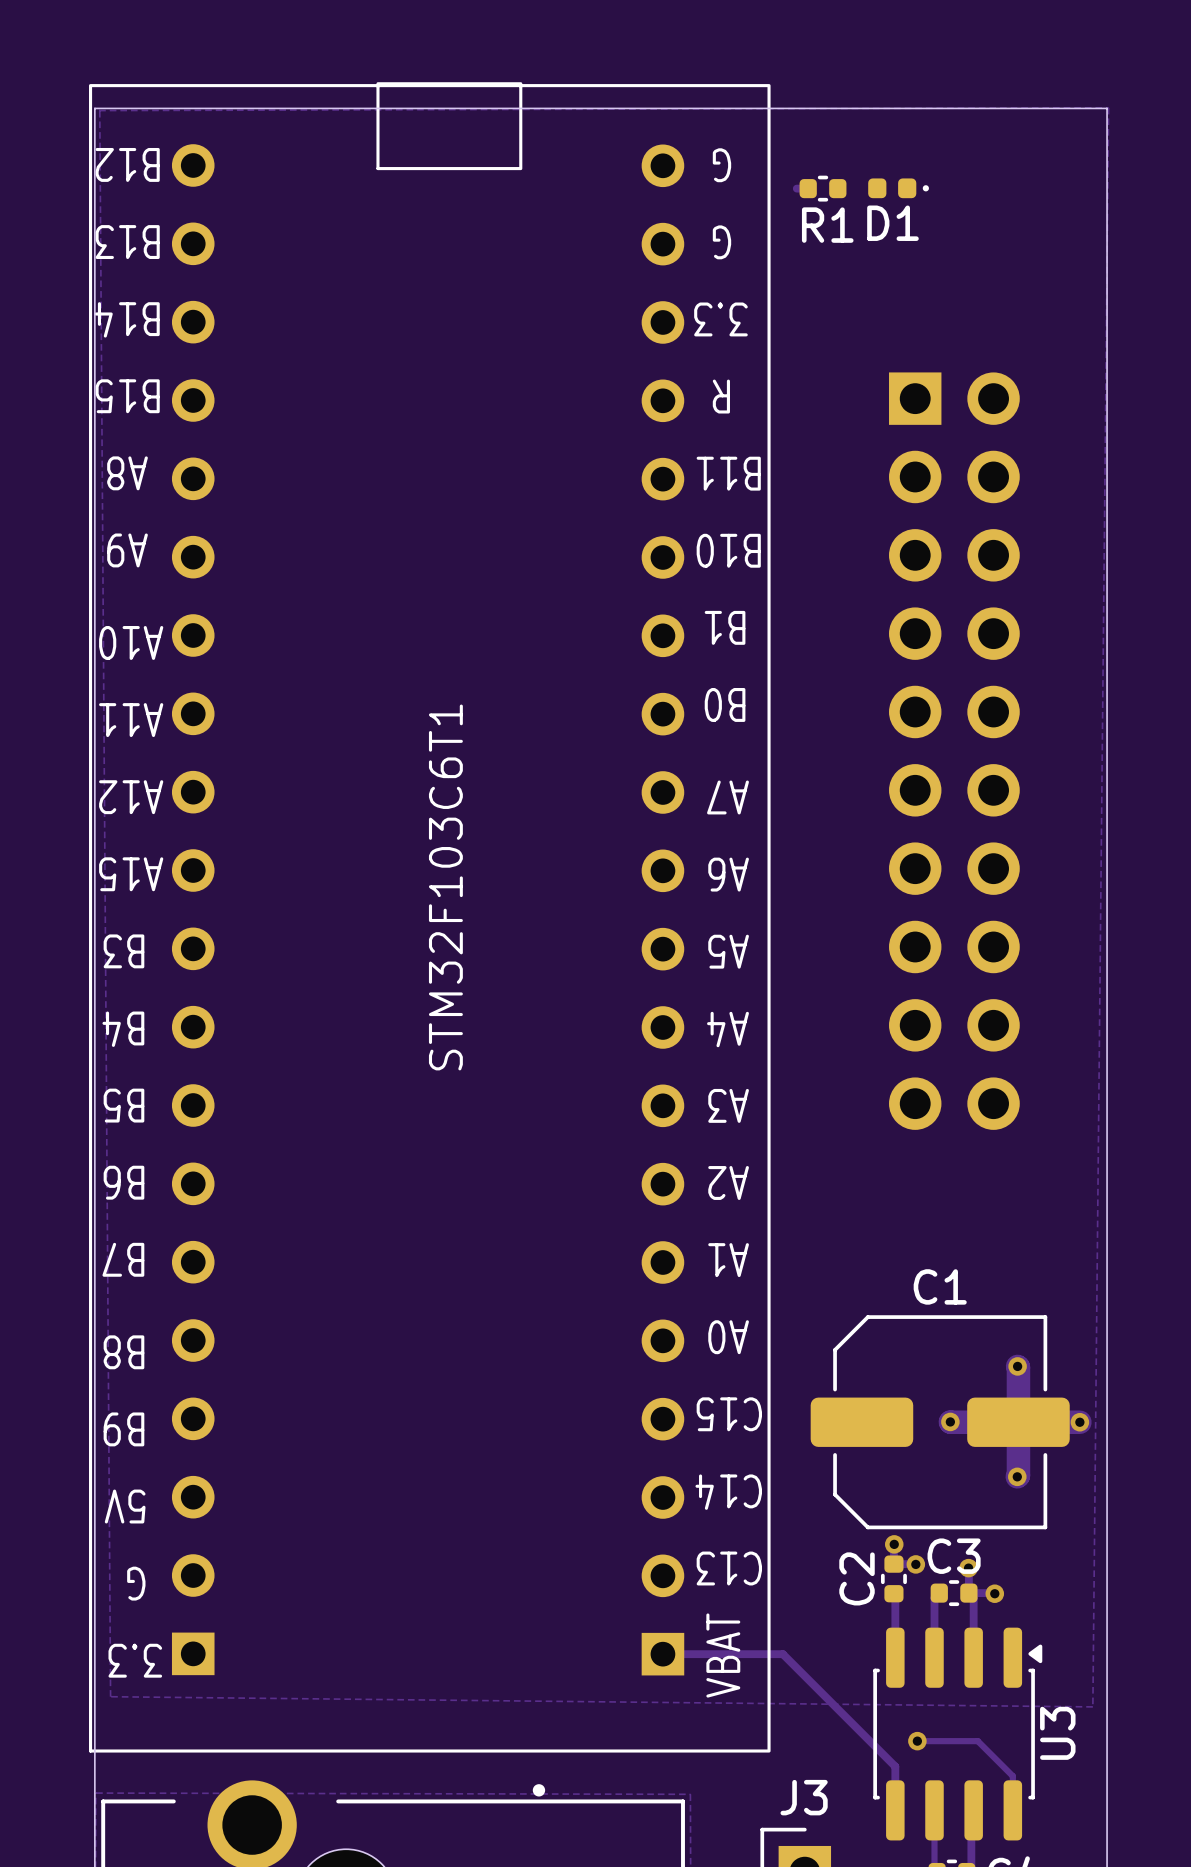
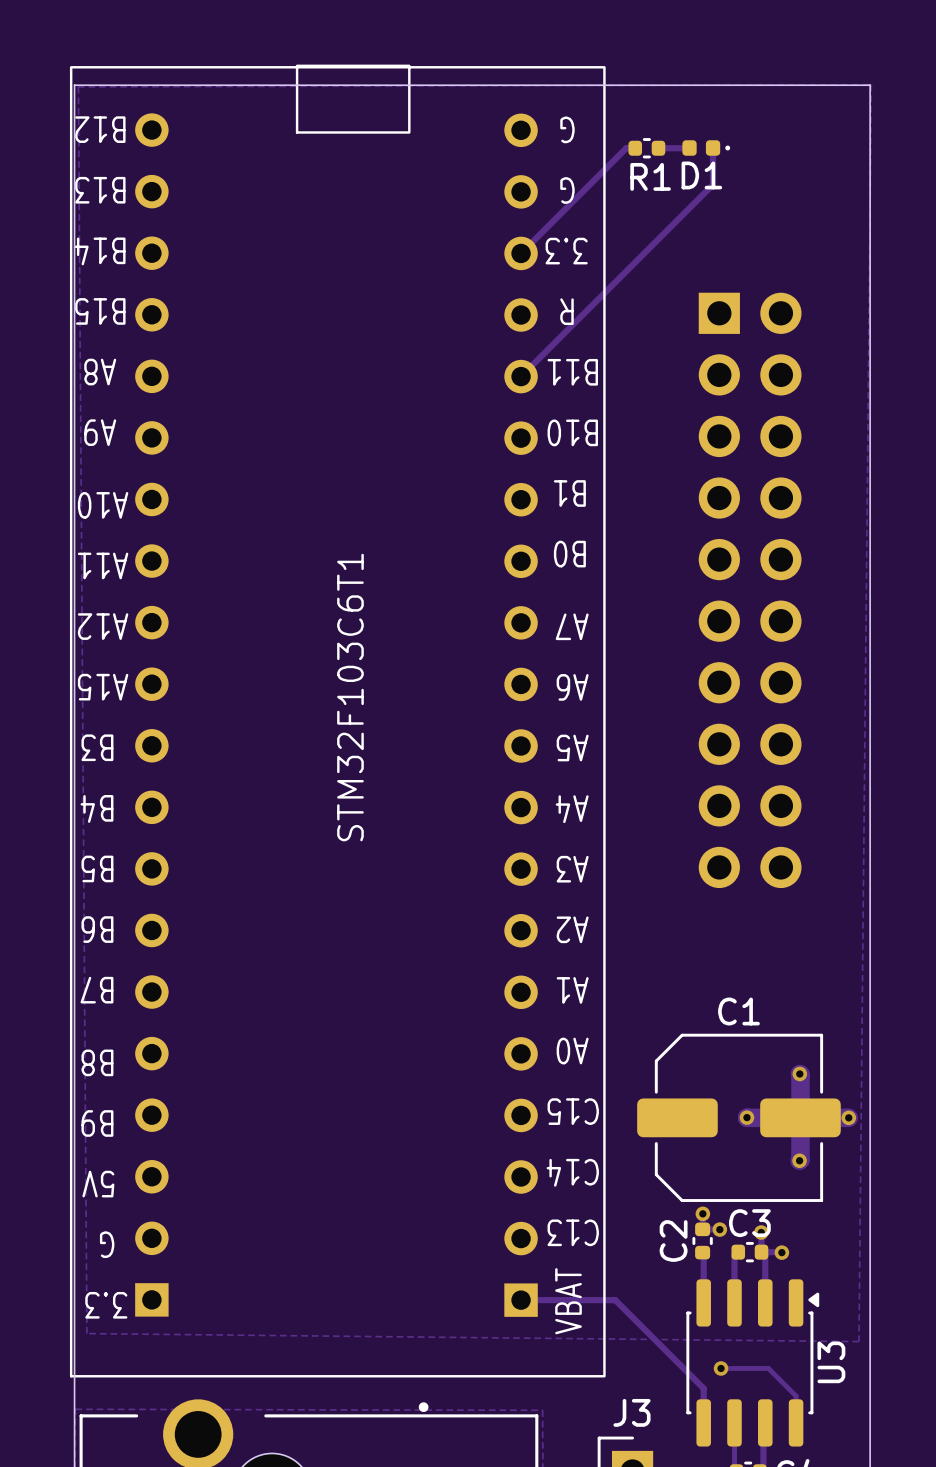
track: none -> (626, 148) (521, 253)
track: none -> (658, 148) (689, 148)
track: none -> (713, 148) (713, 184) (521, 376)

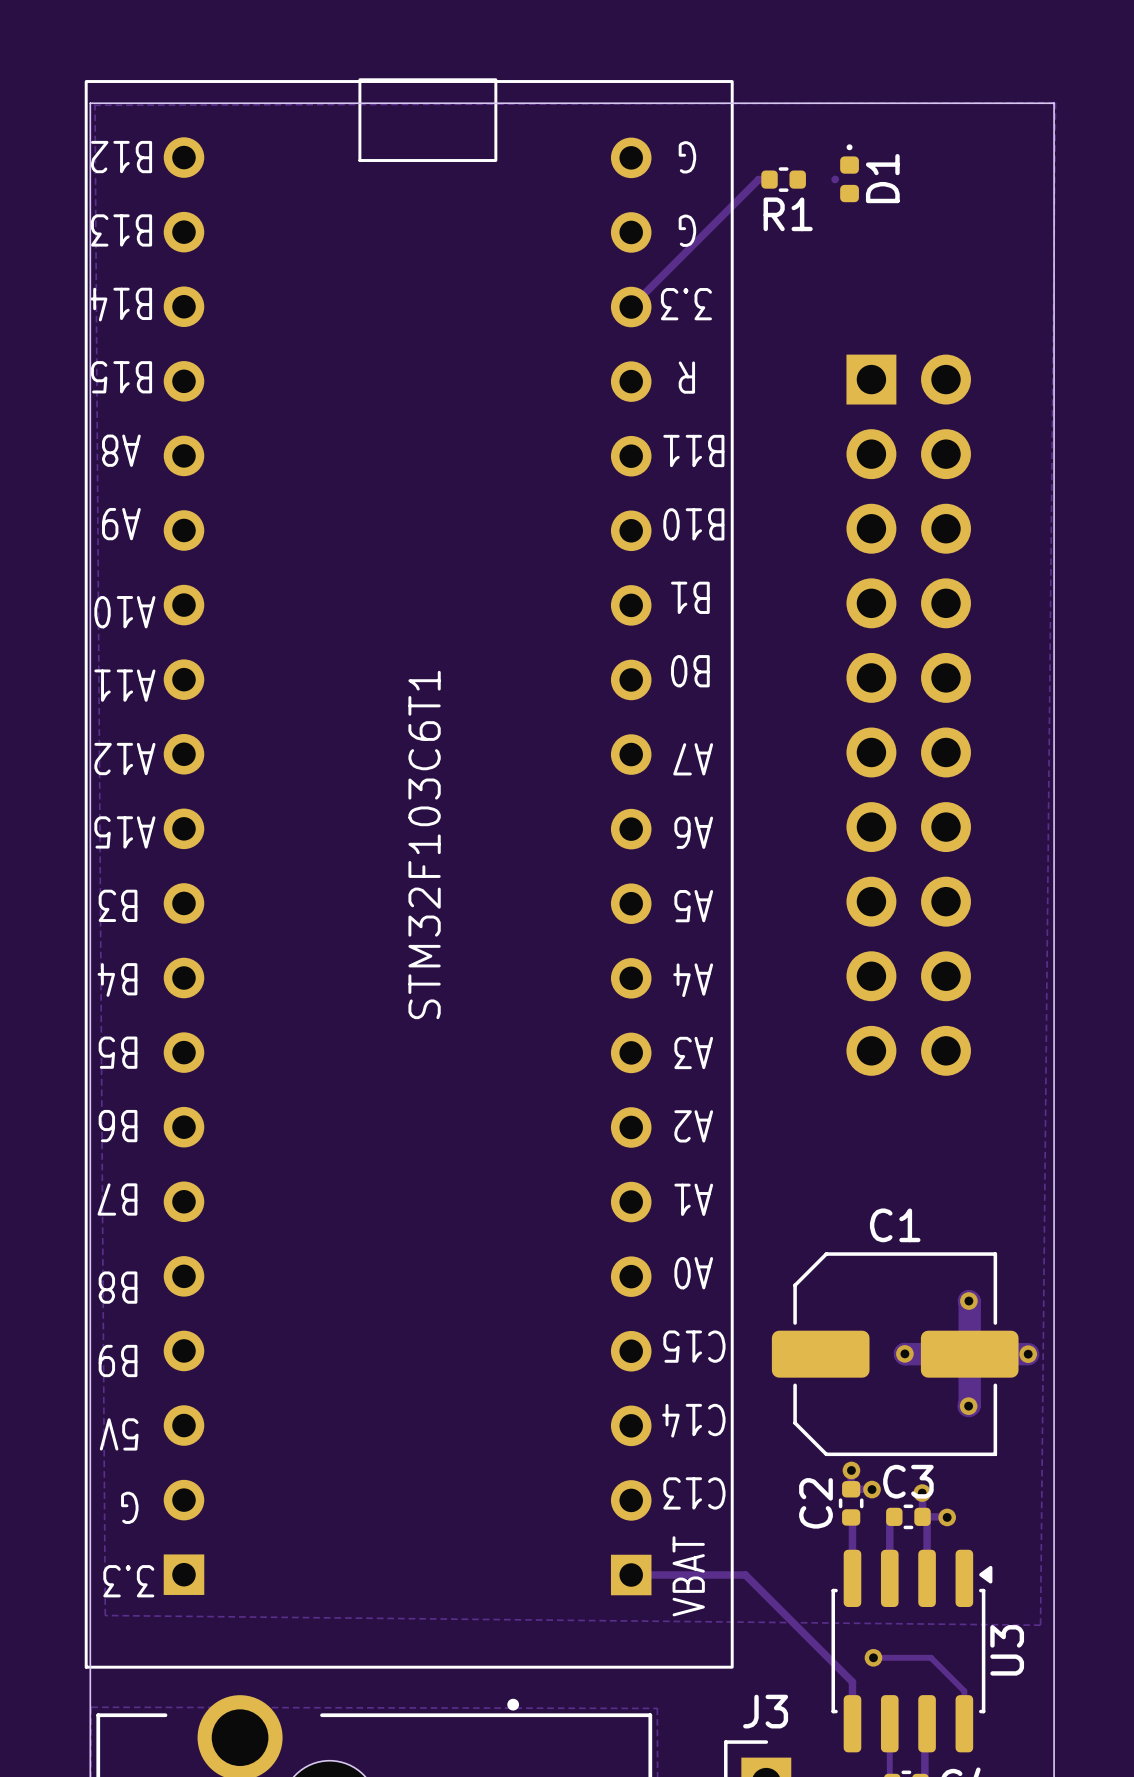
track: (658, 148) (689, 148) -> none
D1 rotation: 0° (706, 148) -> 90° counterclockwise (849, 173)
track: (713, 148) (713, 184) (521, 376) -> none

